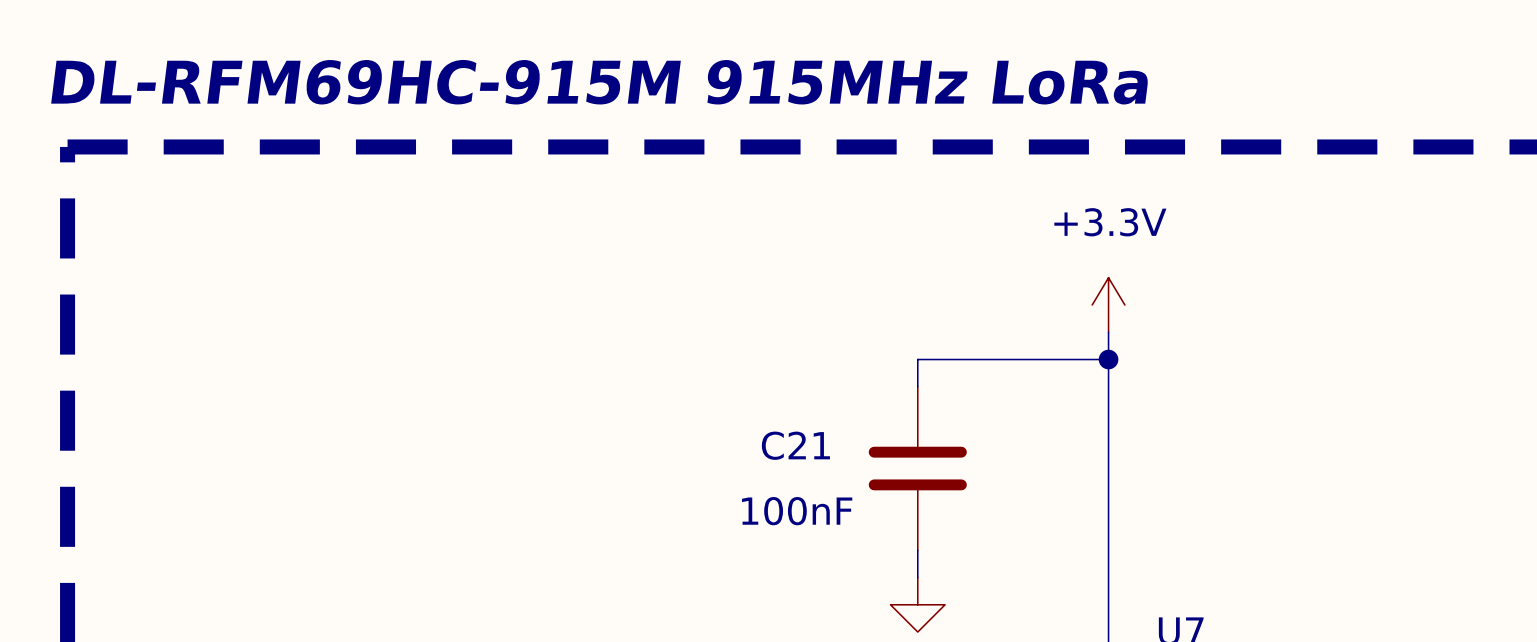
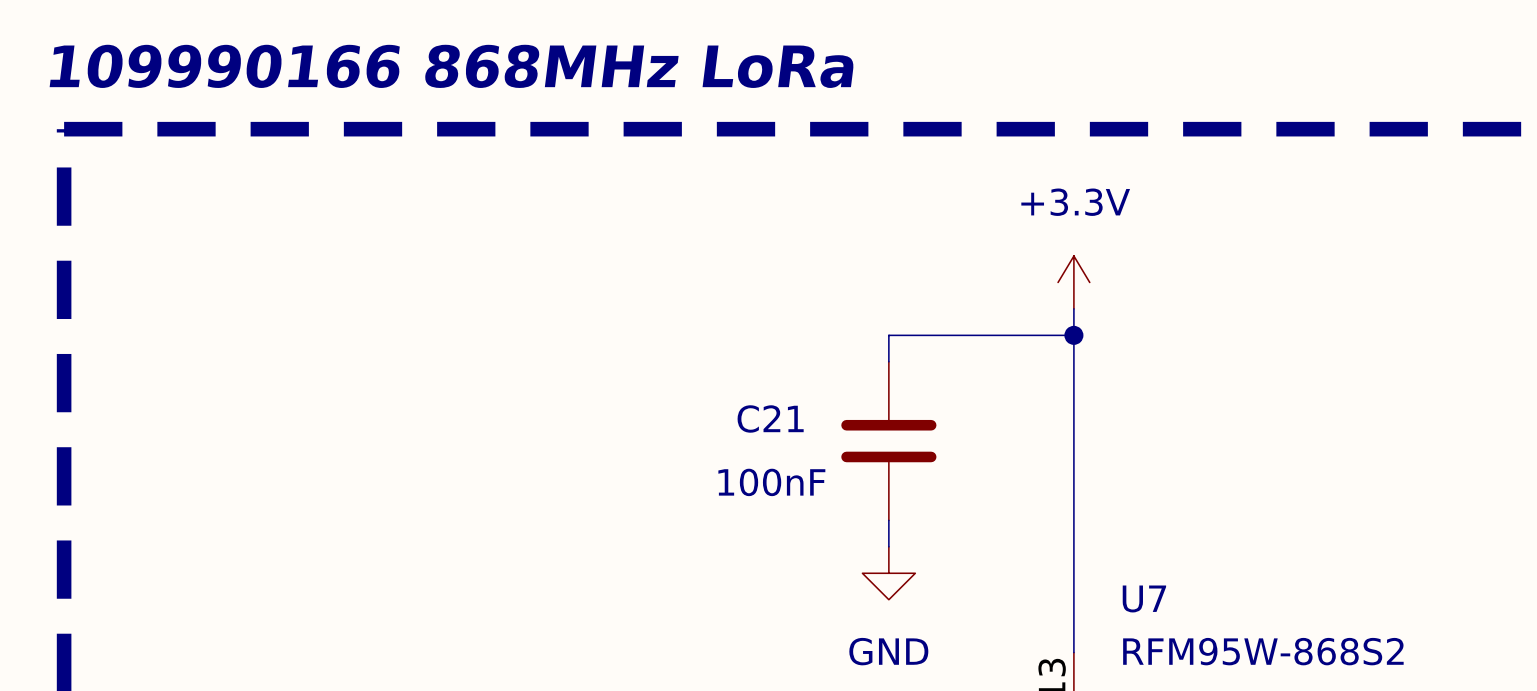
text: DL-RFM69HC-915M 915MHz LoRa (599, 82) -> 109990166 868MHz LoRa (451, 66)

